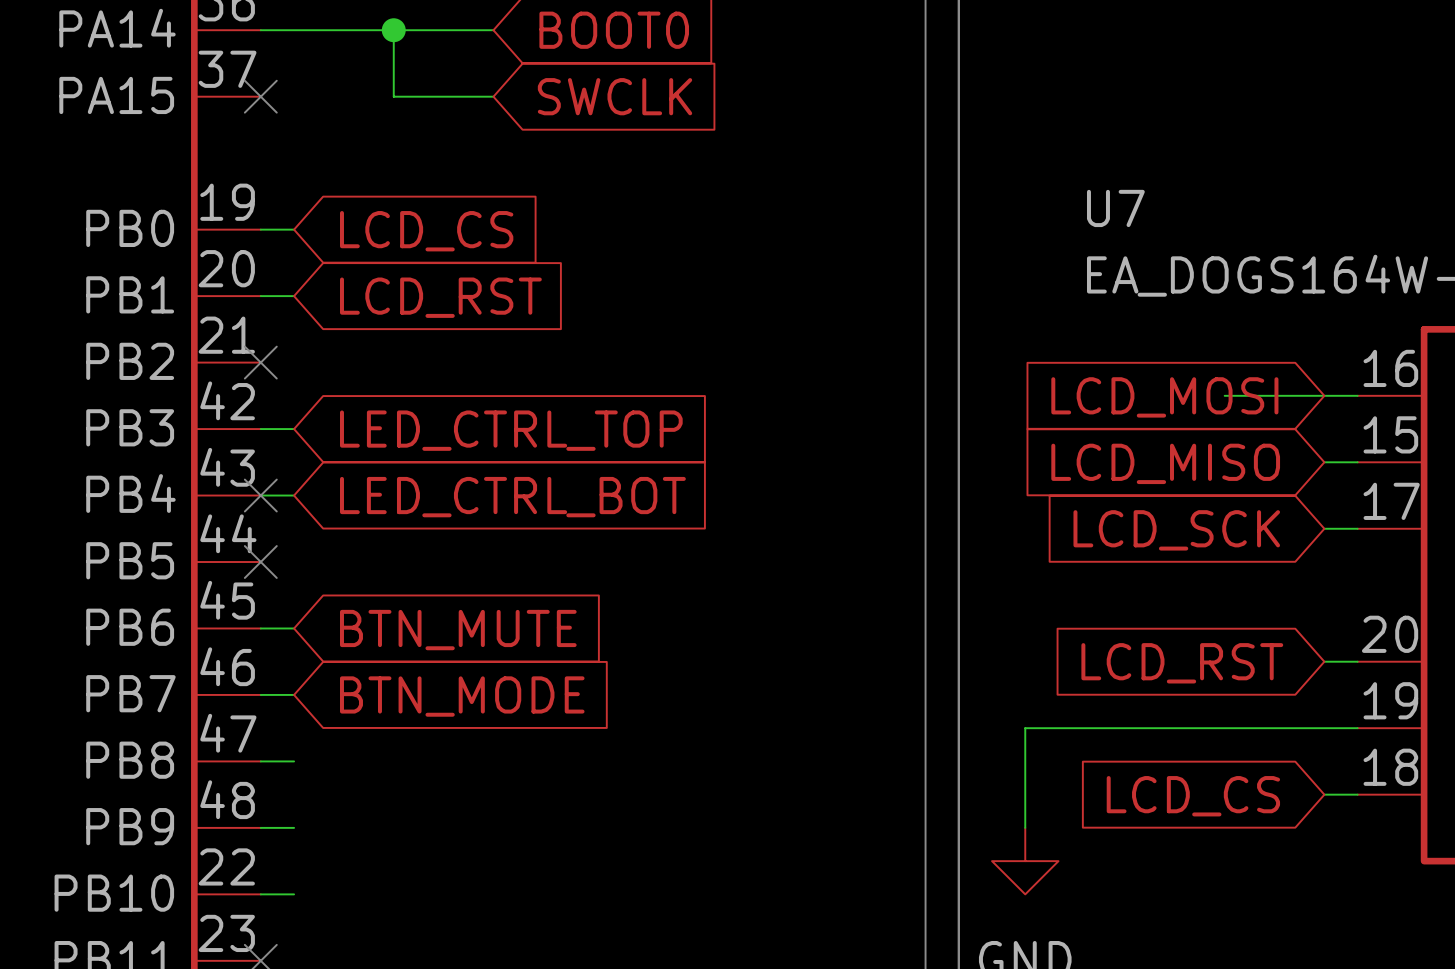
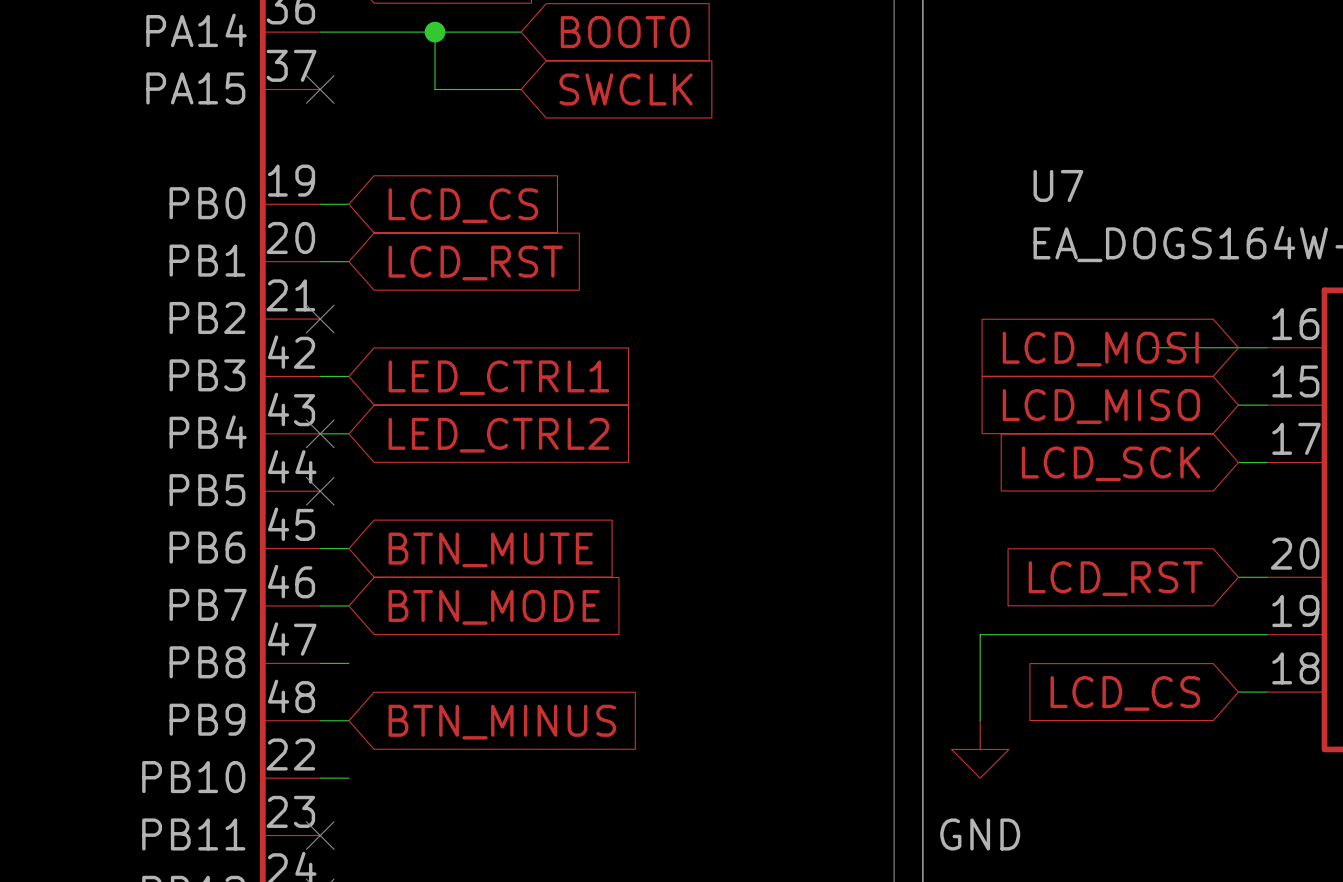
global label: LED_CTRL_TOP (511, 430) -> LED_CTRL1 (498, 377)
global label: LED_CTRL_BOT (512, 497) -> LED_CTRL2 (498, 435)
global label: none -> BTN_MINUS (502, 722)

